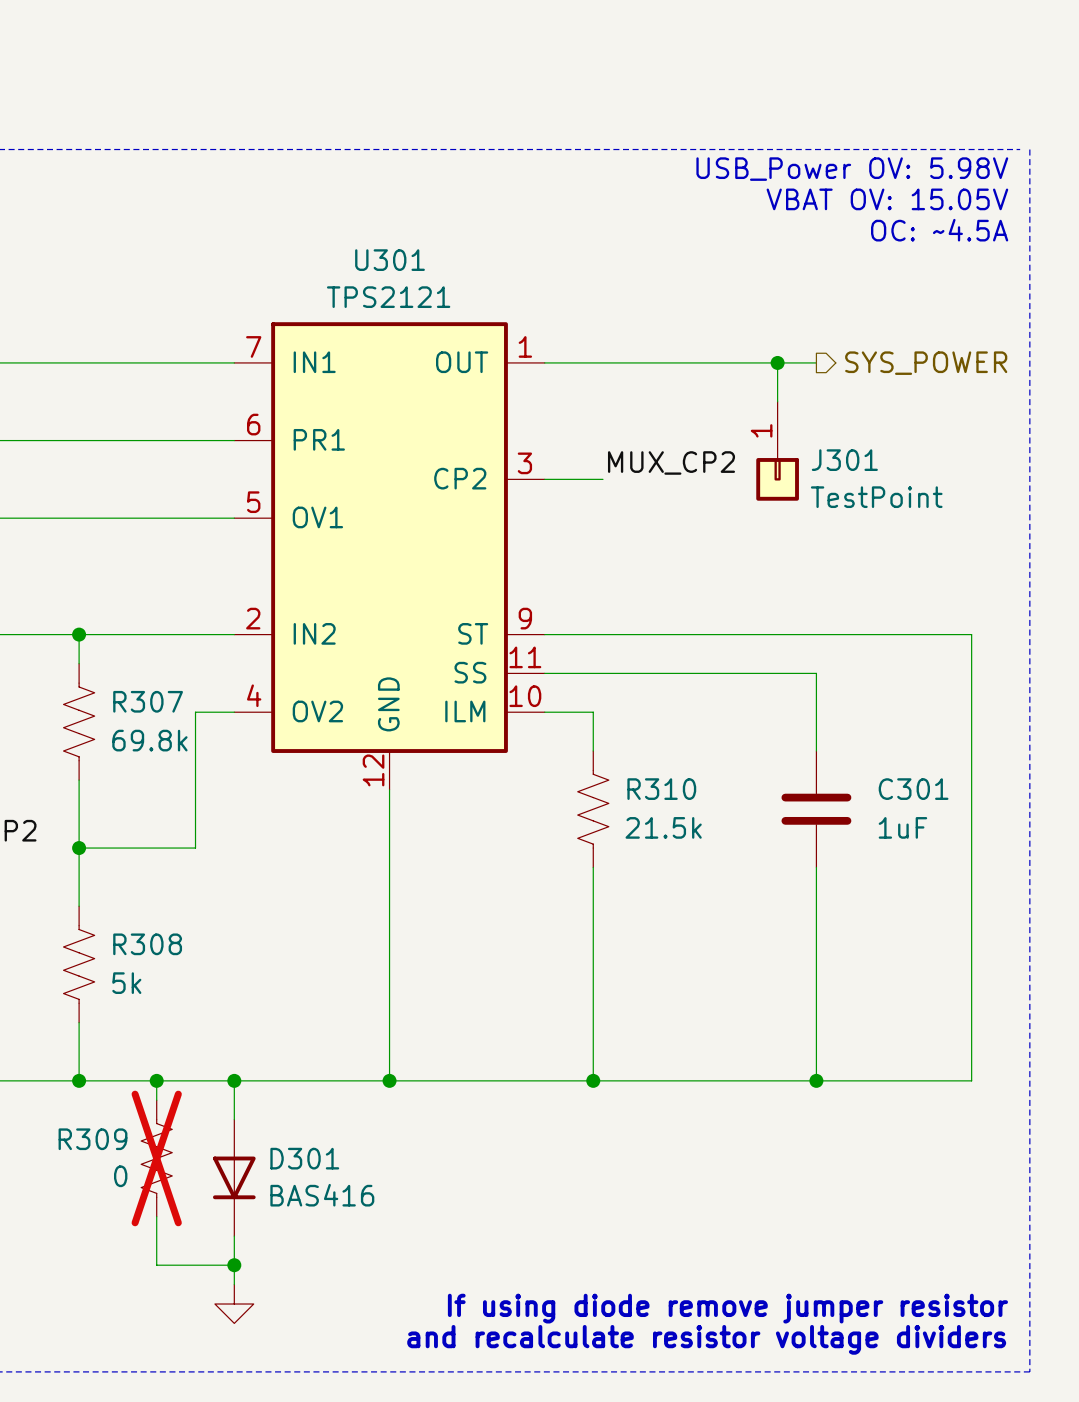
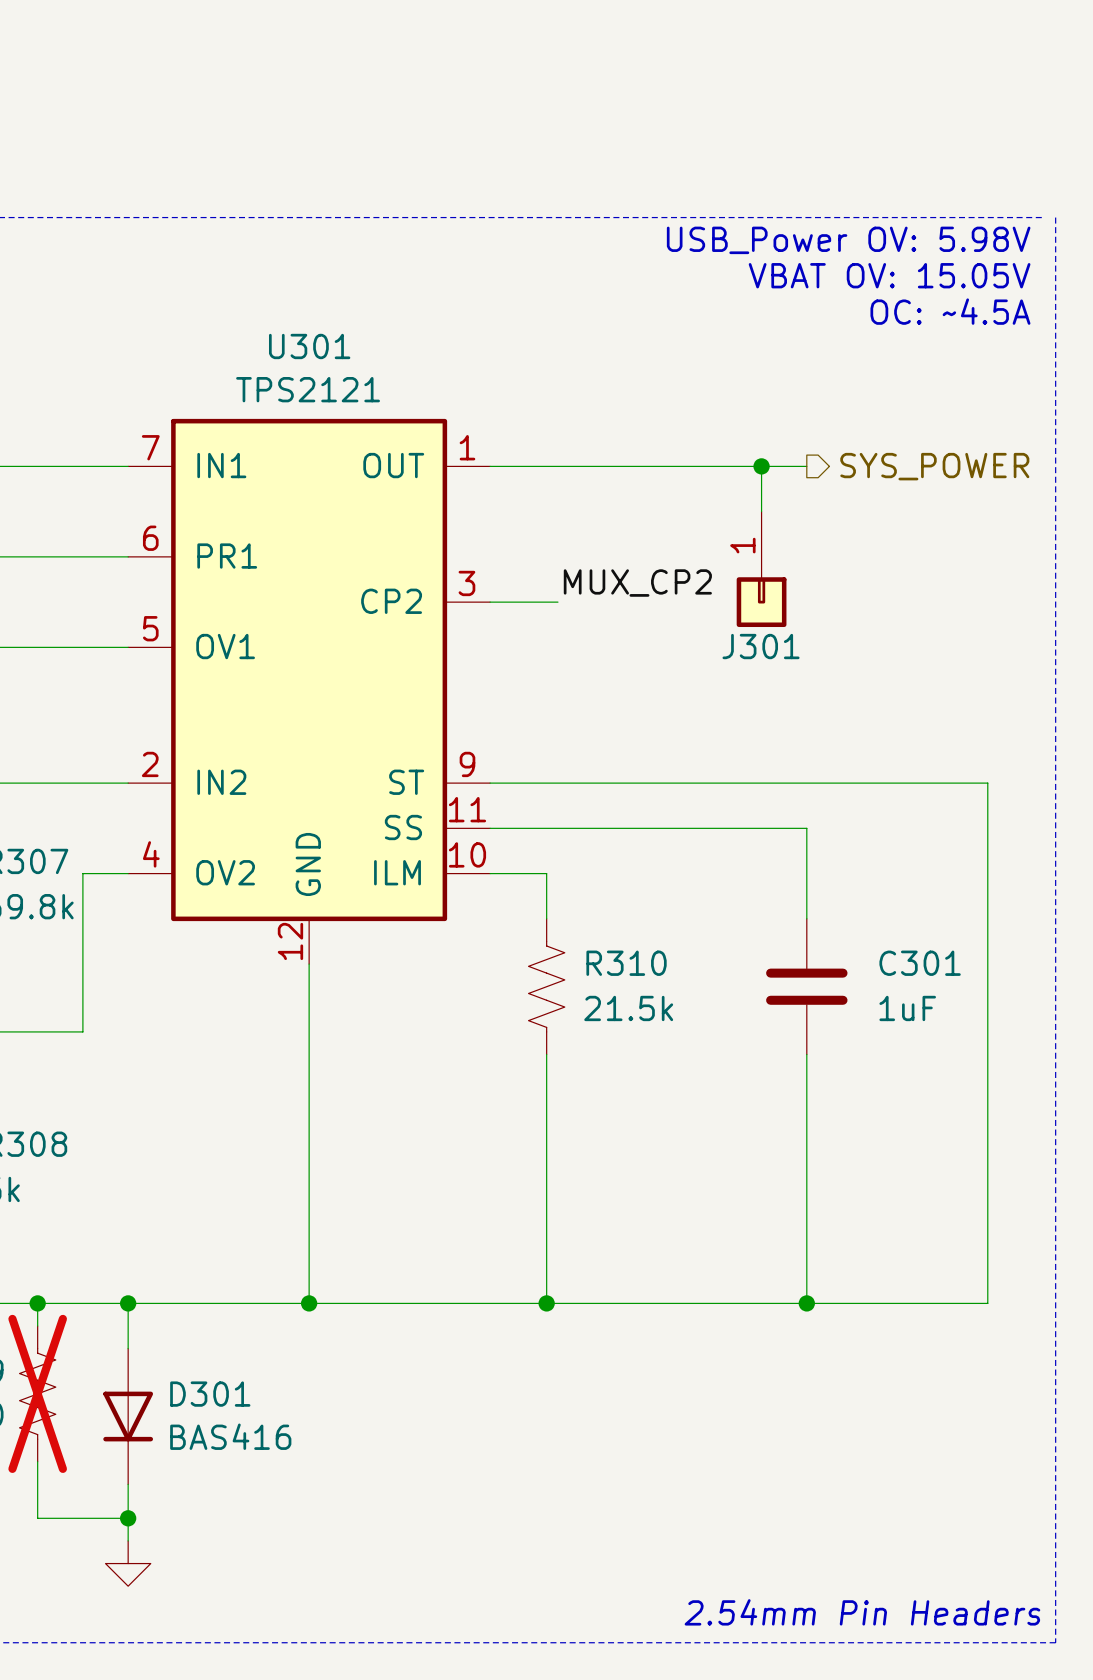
J301 name position: J301 (844, 460) -> J301 (761, 646)
J301 value: TestPoint (876, 497) -> none
text: If using diode remove jumper resistor (727, 1308) -> none
text: and recalculate resistor voltage dividers (706, 1339) -> 2.54mm Pin Headers (862, 1612)

